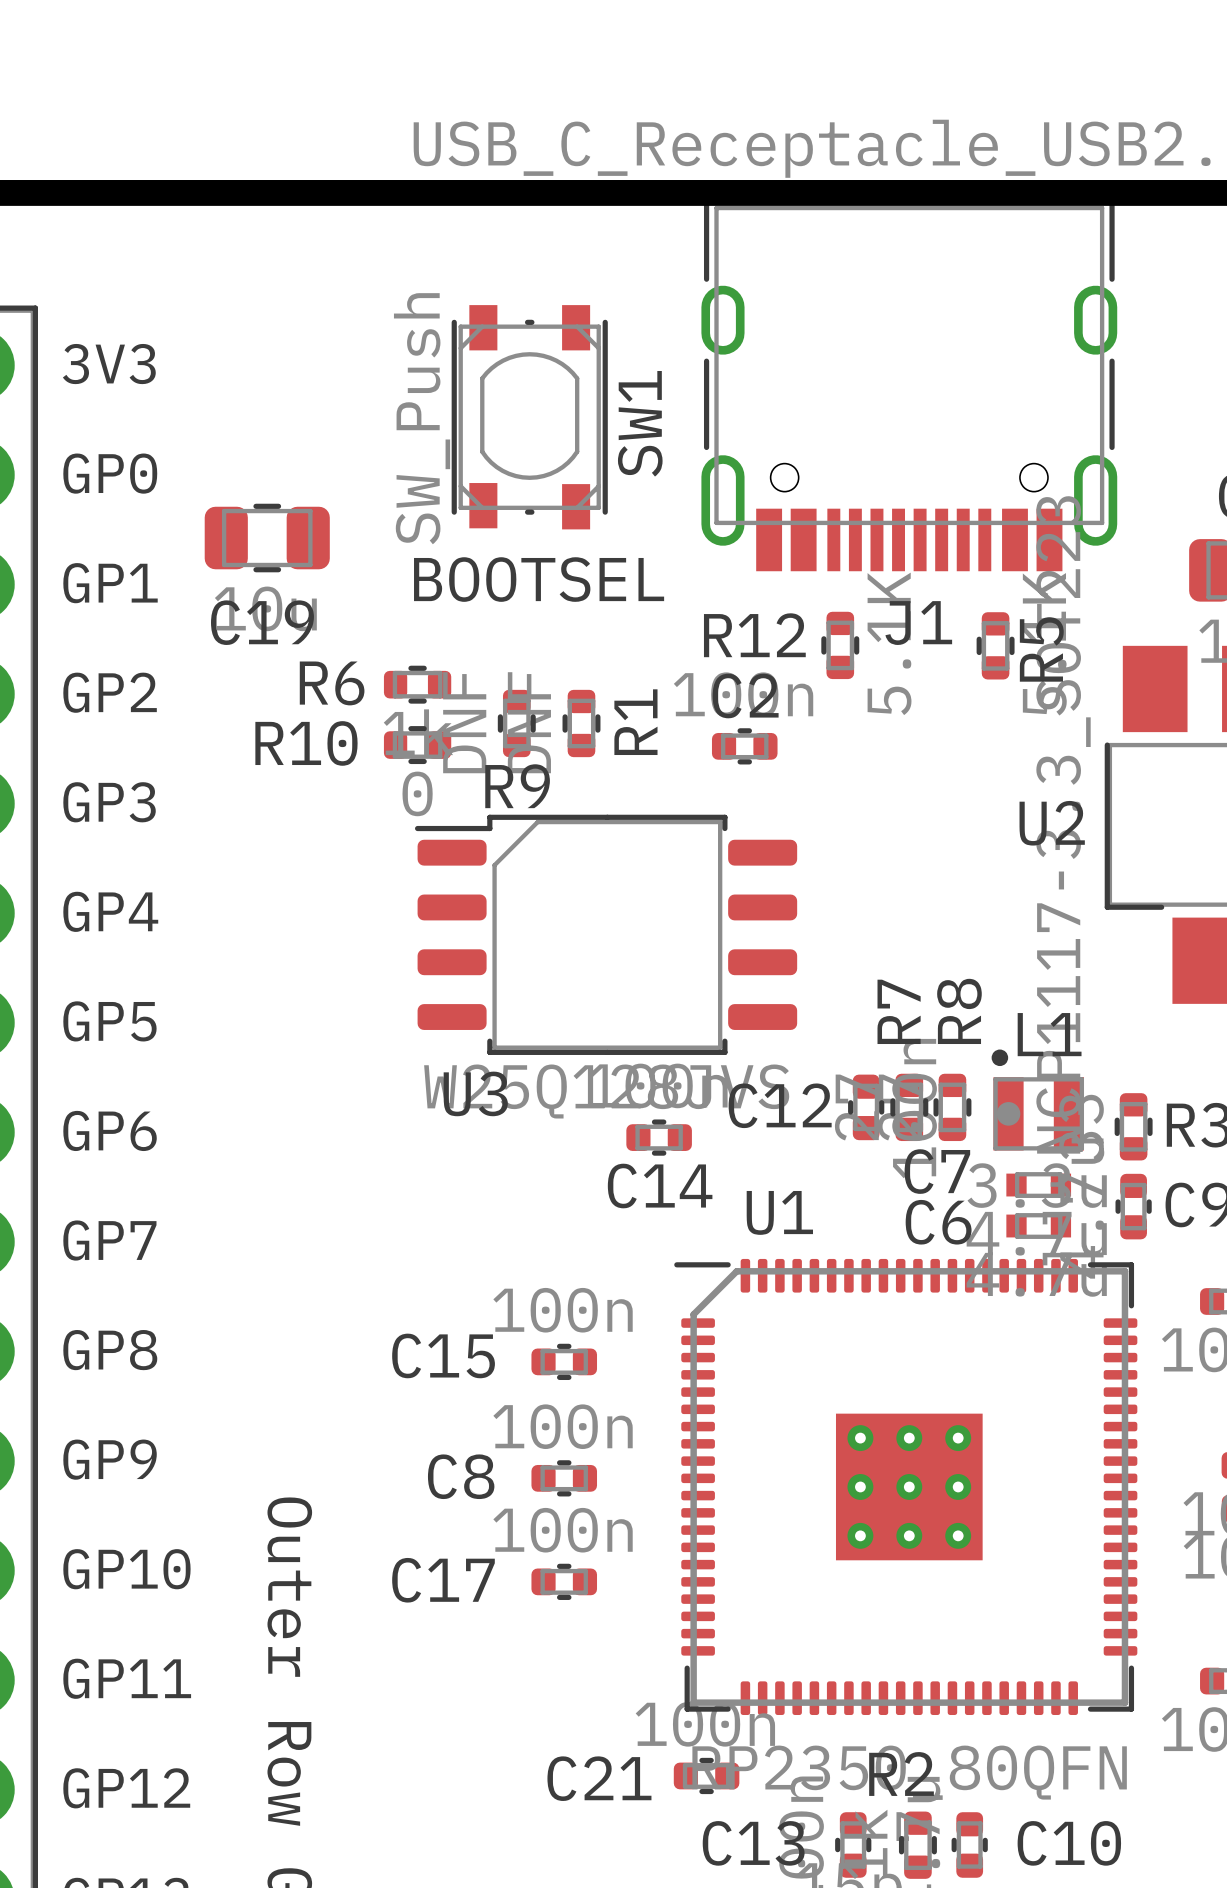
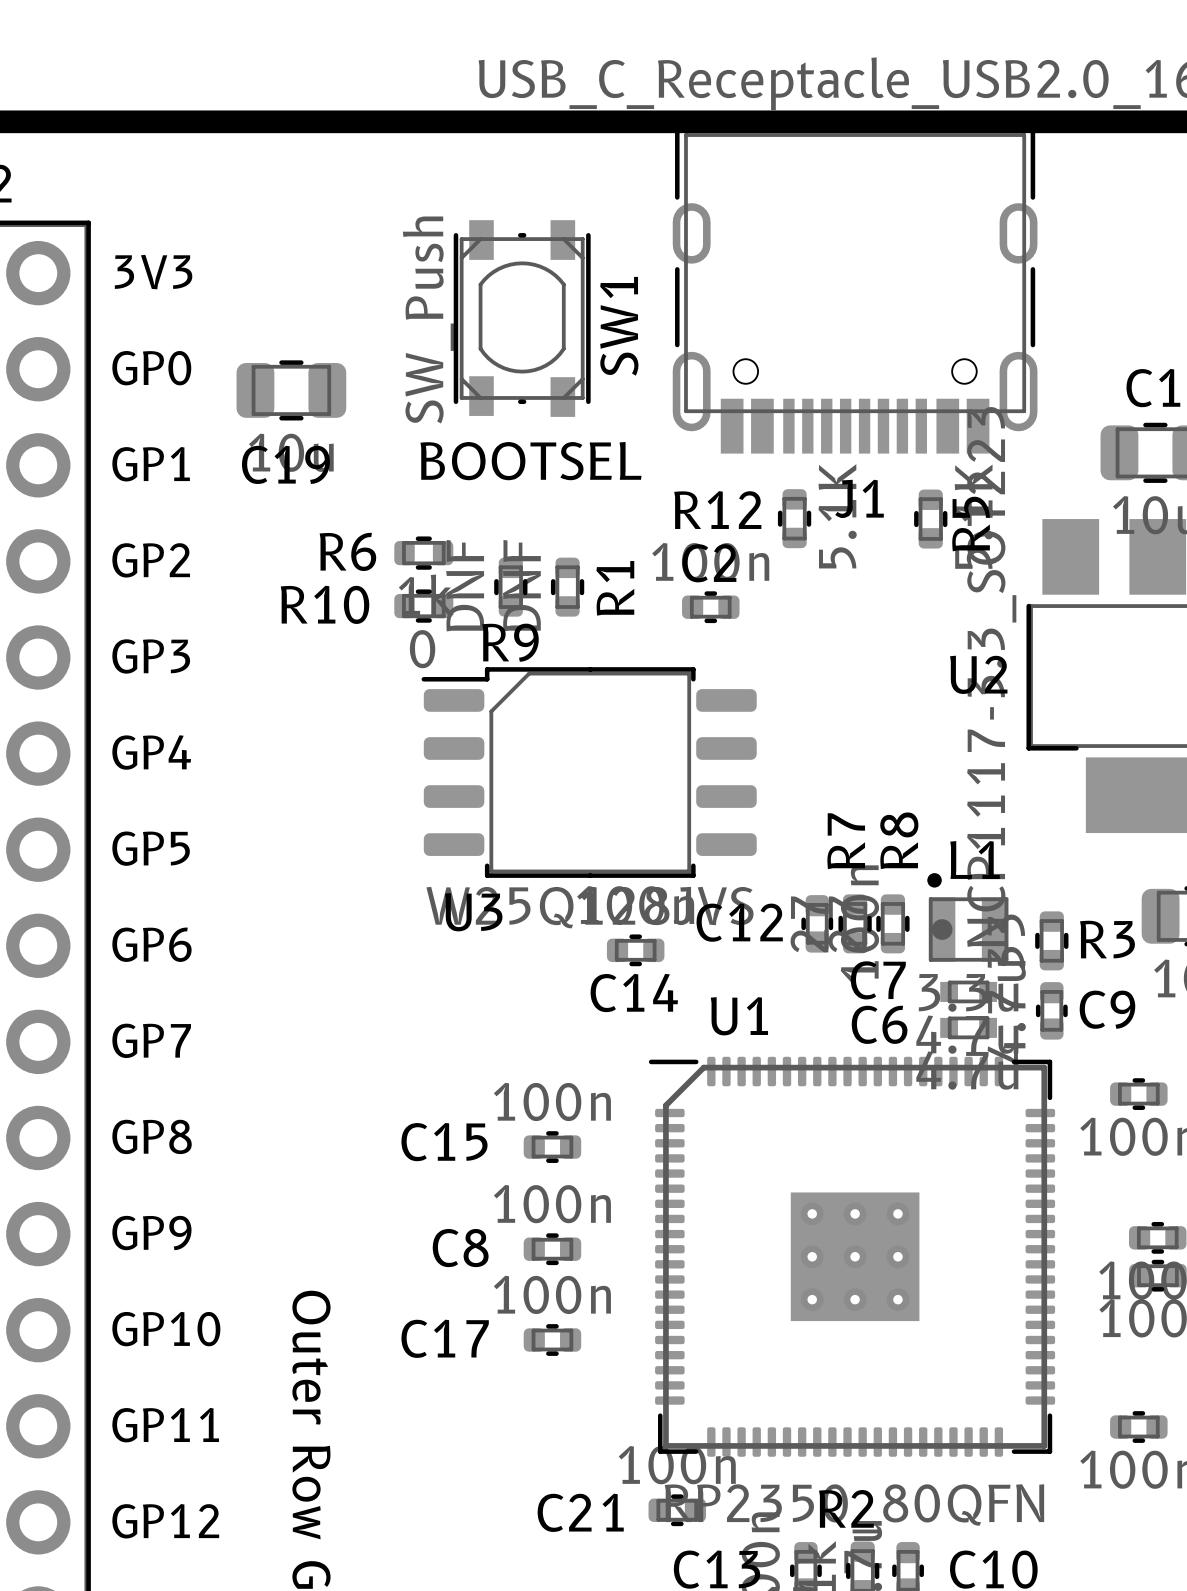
C19 position: (267, 538) -> (291, 390)

